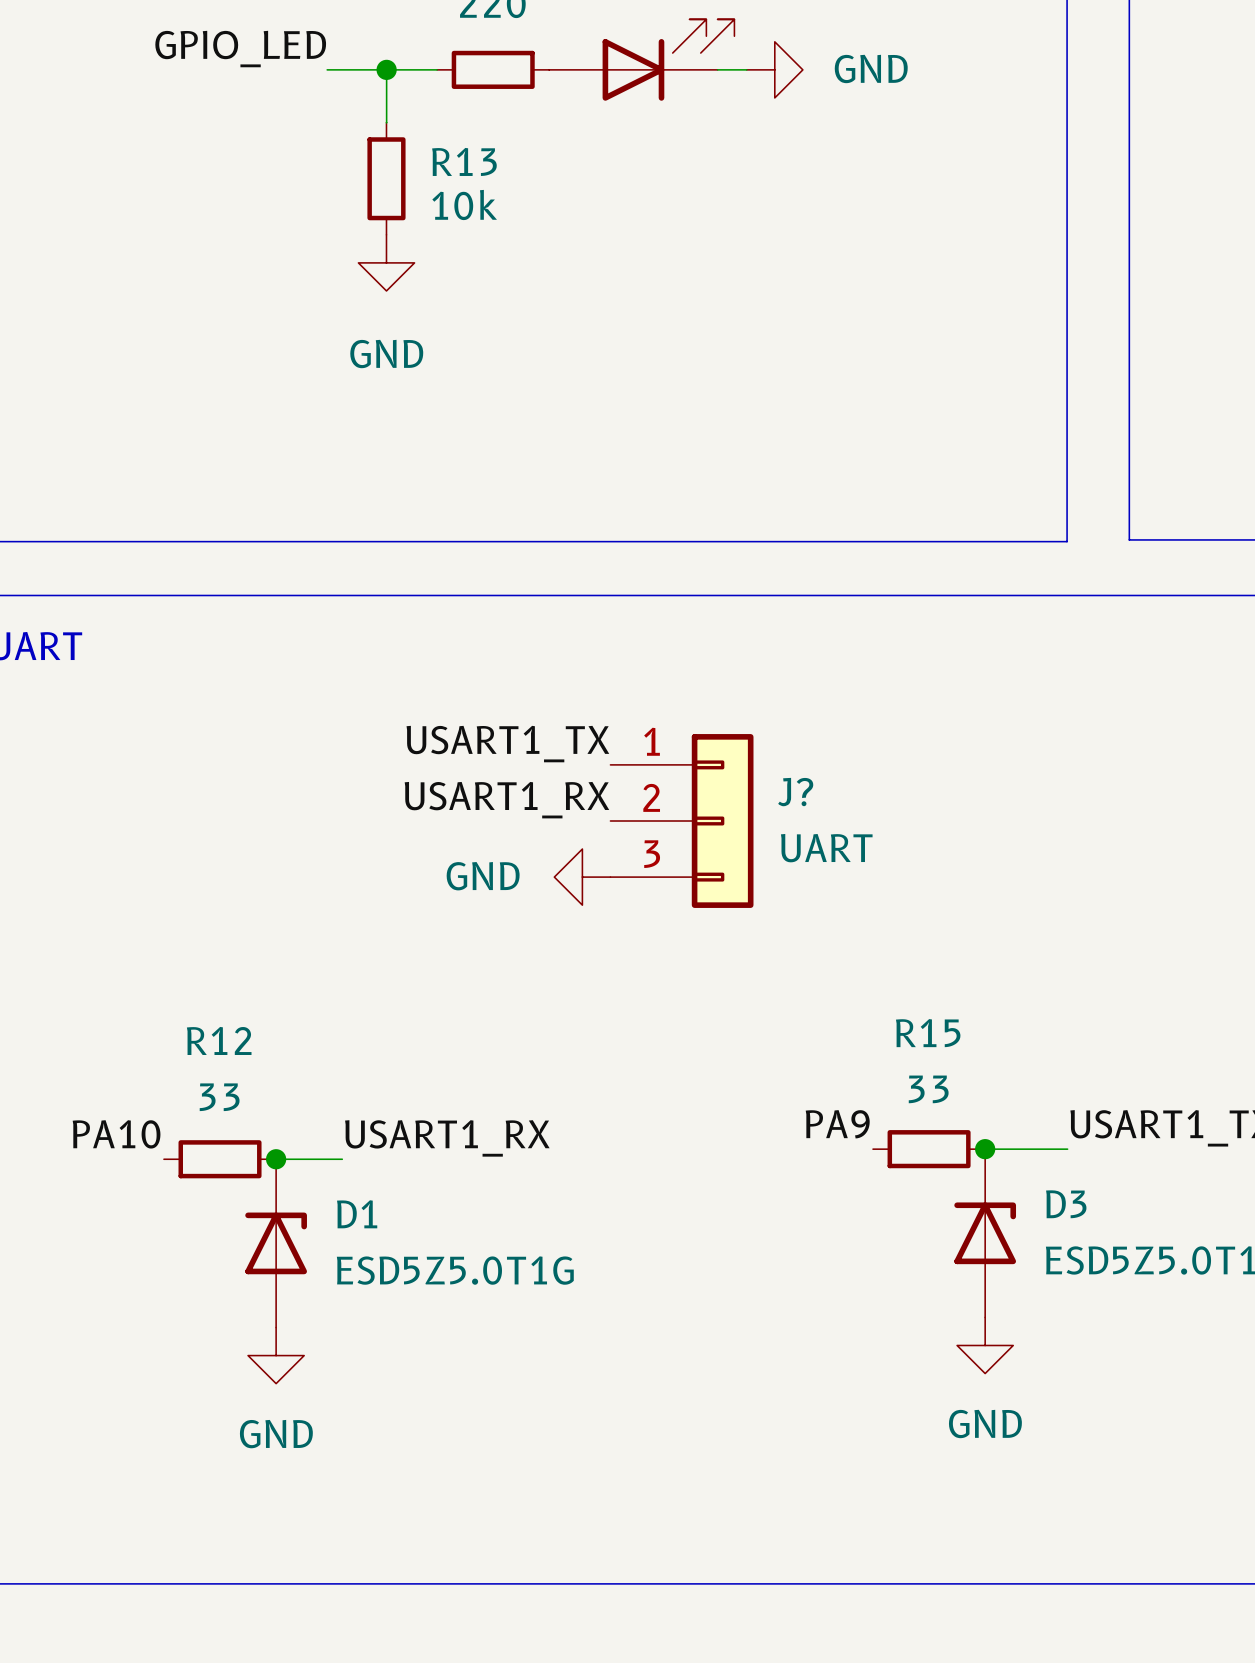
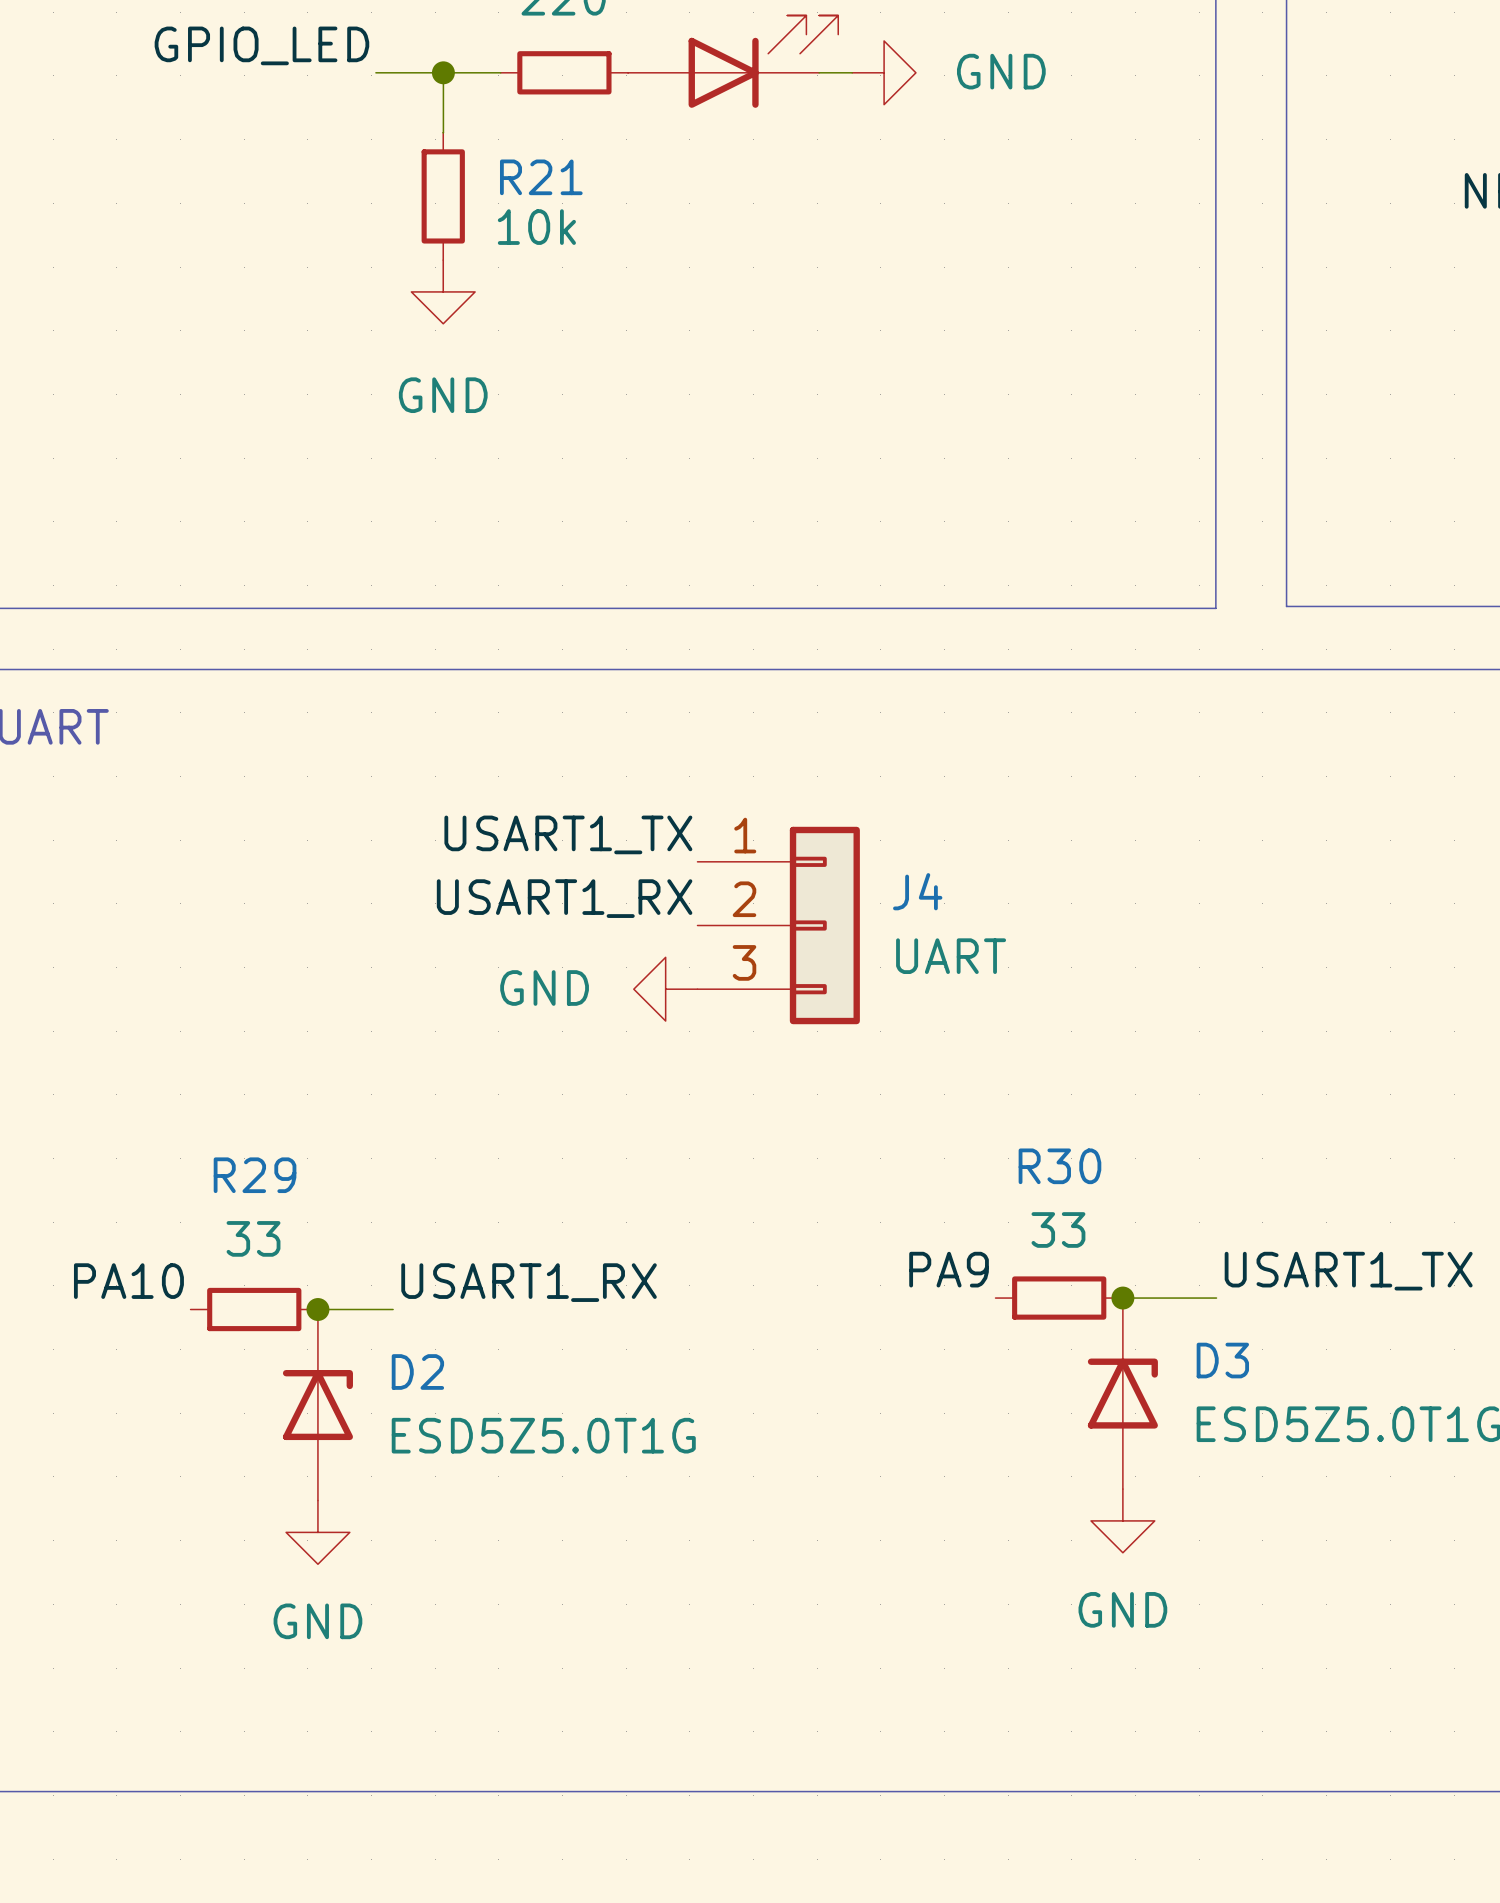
R13 name: R13 (464, 161) -> R21 (541, 177)
J? name: J? (795, 792) -> J4 (917, 891)
R15 name: R15 (928, 1033) -> R30 (1059, 1166)
R12 name: R12 (219, 1040) -> R29 (255, 1175)
D1 name: D1 (357, 1214) -> D2 (417, 1372)

